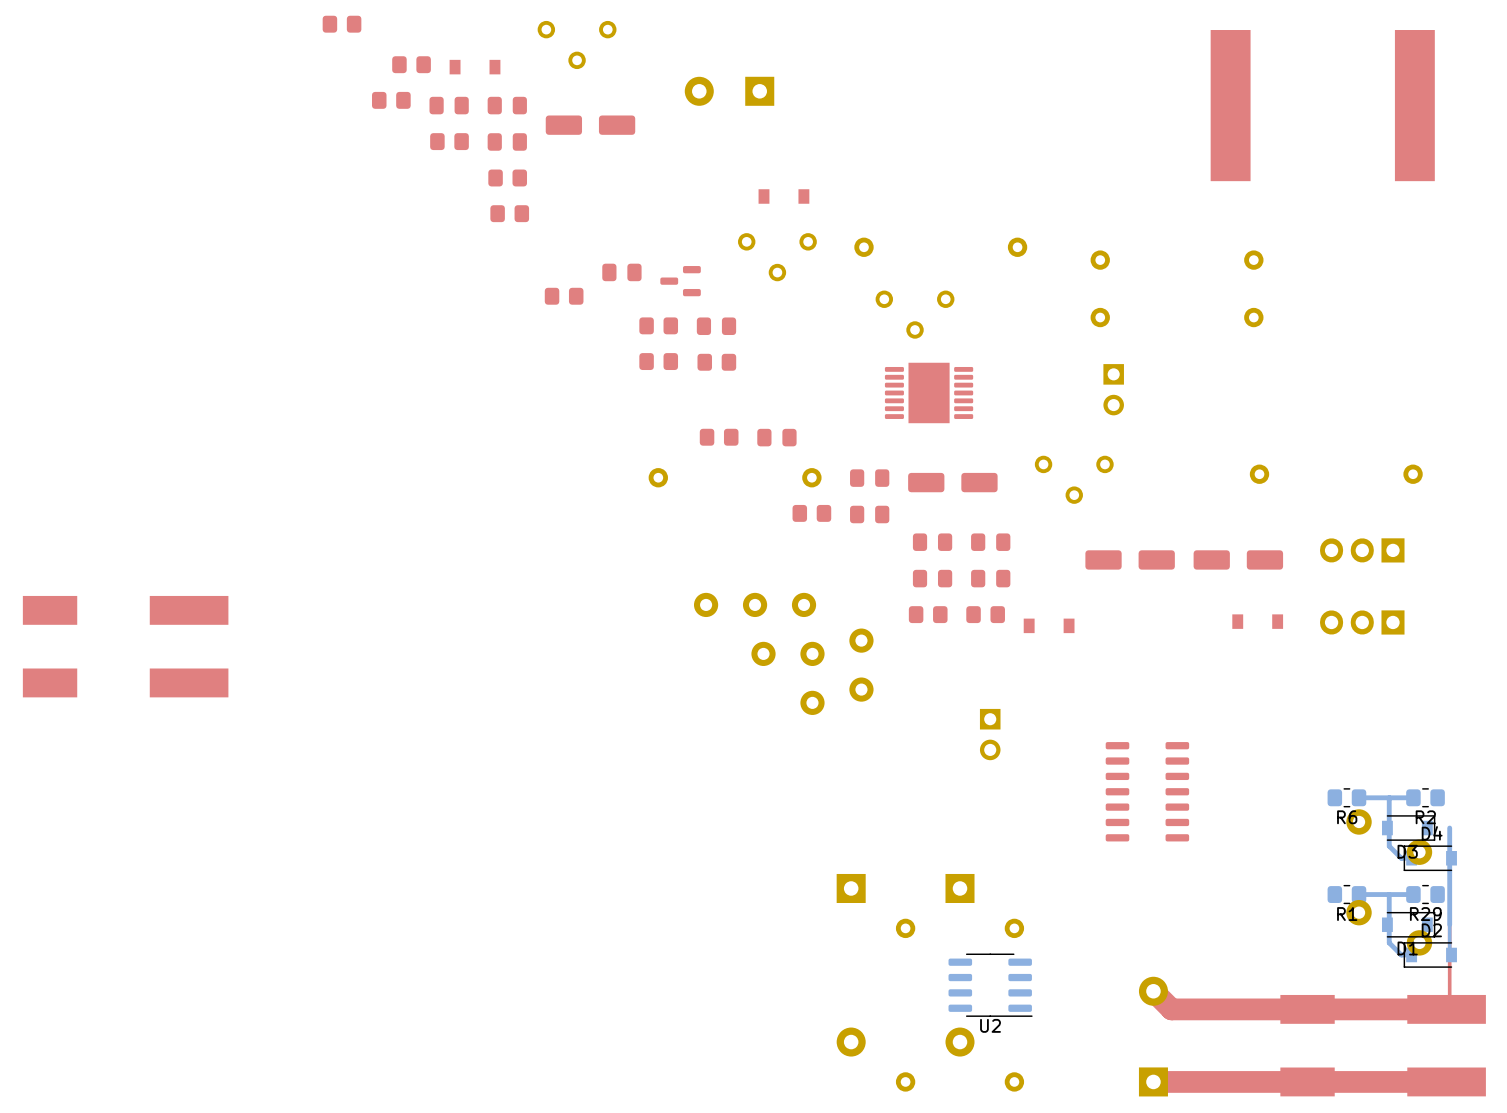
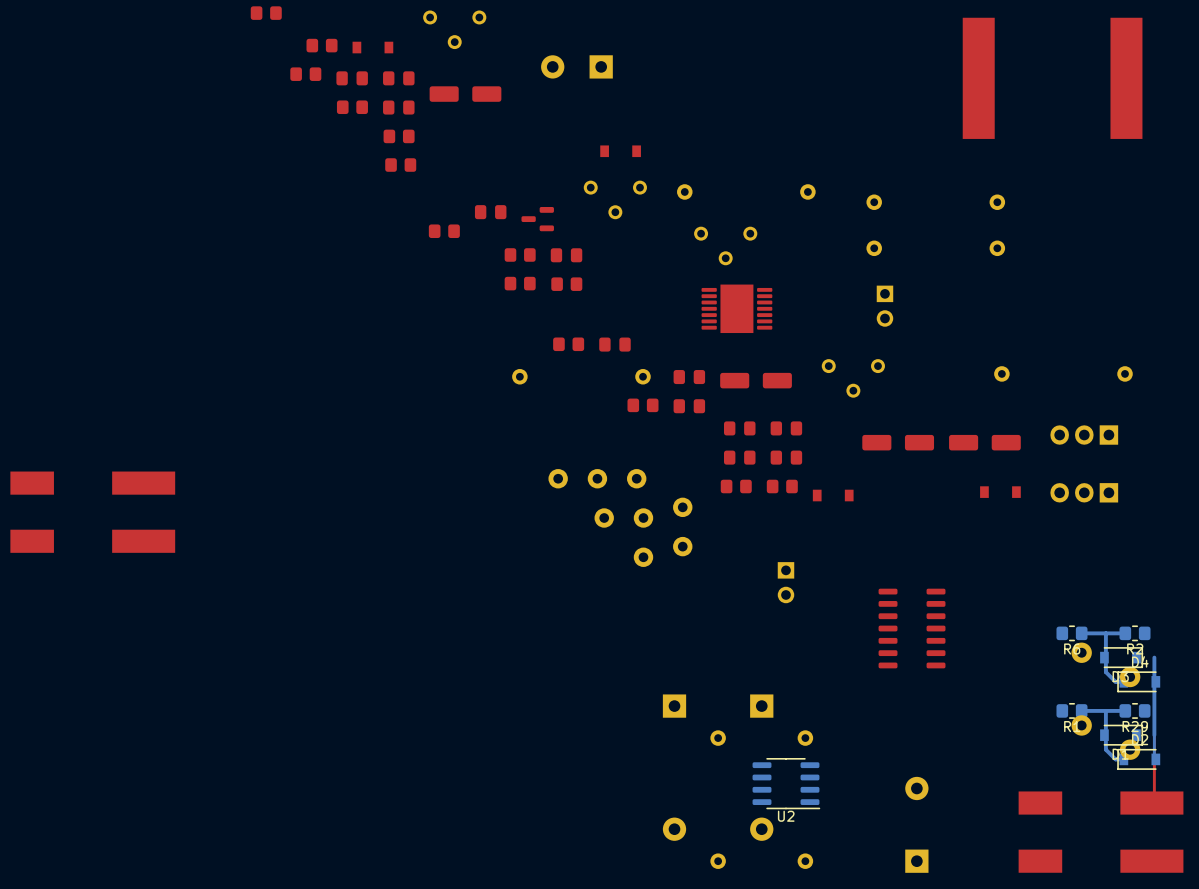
top track: (1153, 991) (1171, 1009) (1446, 1009) -> none
top track: (1446, 1081) (1153, 1081) -> none

